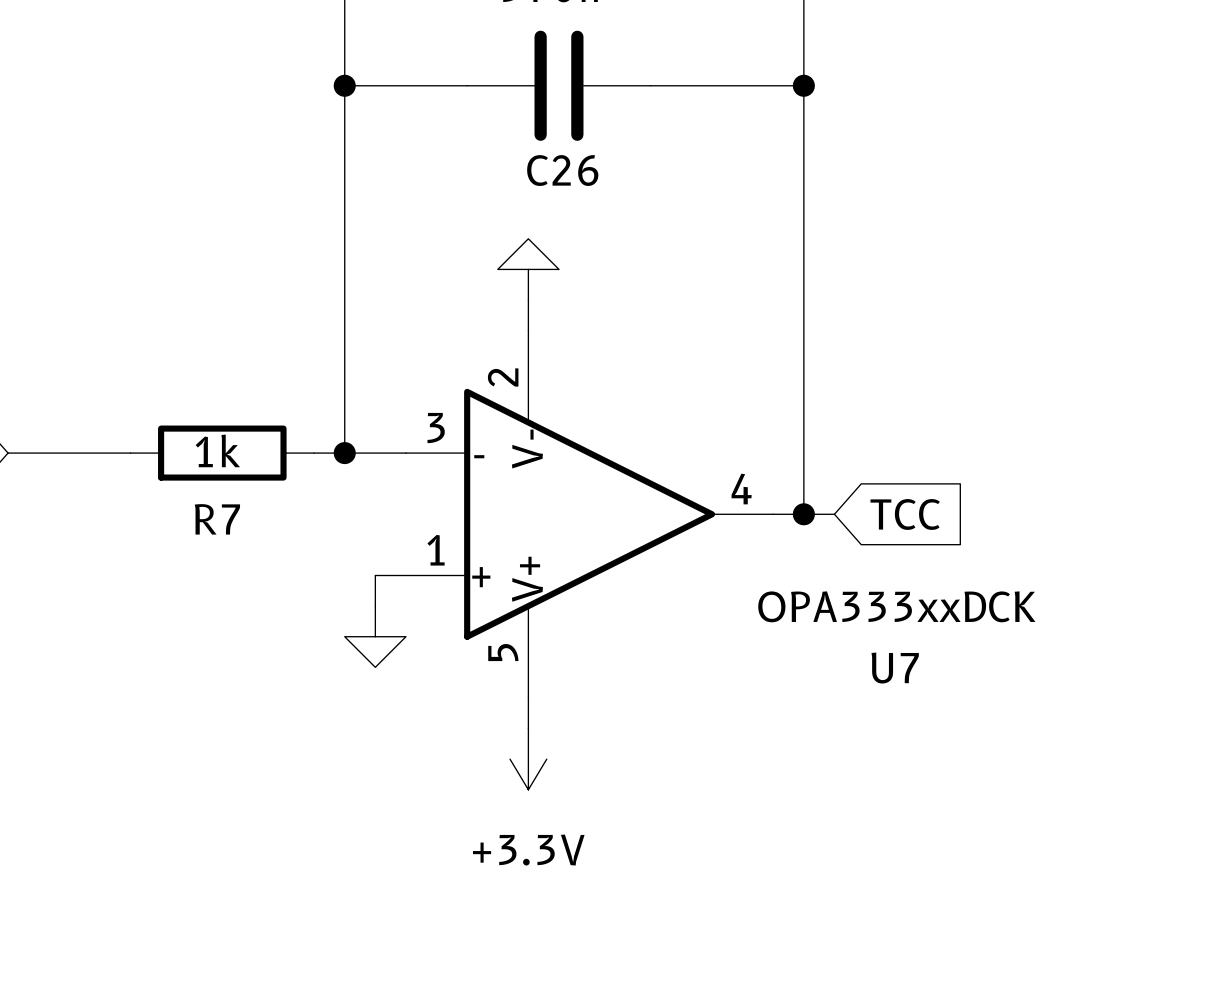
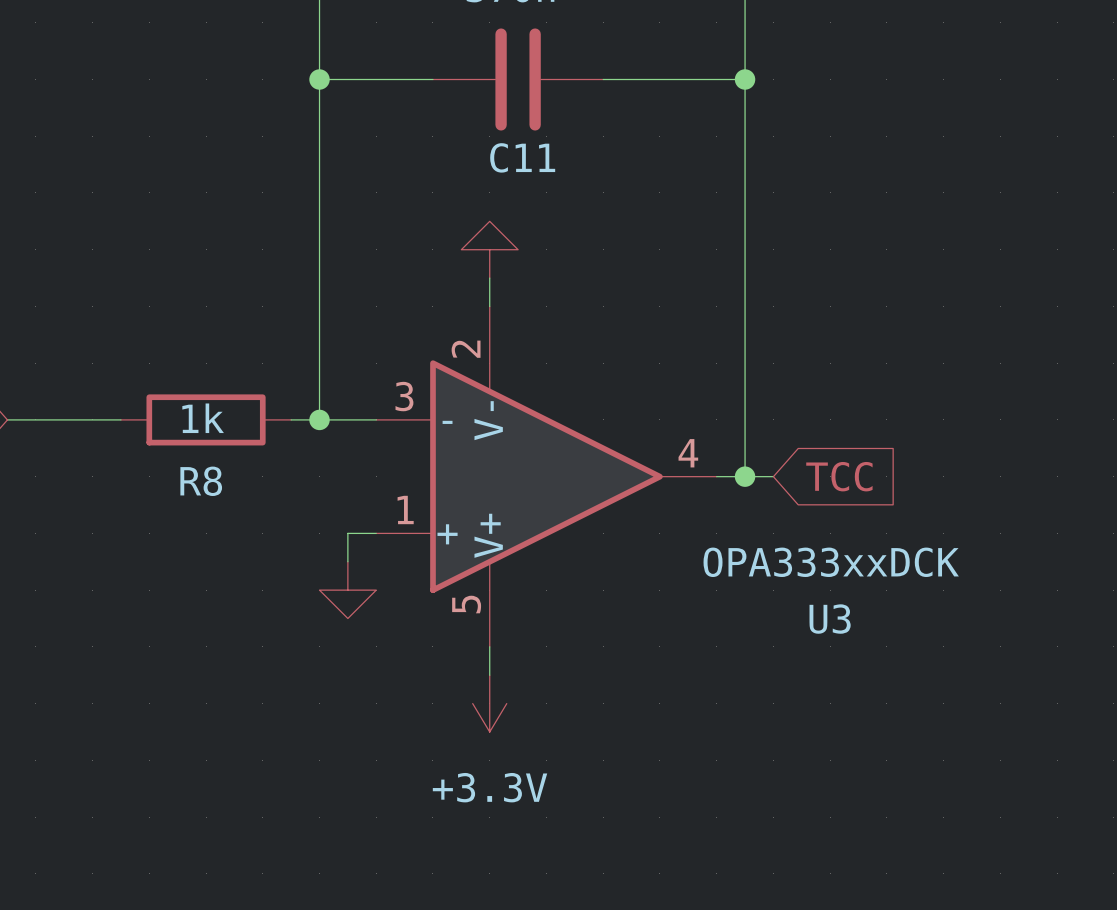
C26 name: C26 (562, 170) -> C11 (522, 157)
R7 name: R7 (217, 519) -> R8 (201, 481)
U7 name: U7 (895, 668) -> U3 (830, 619)

